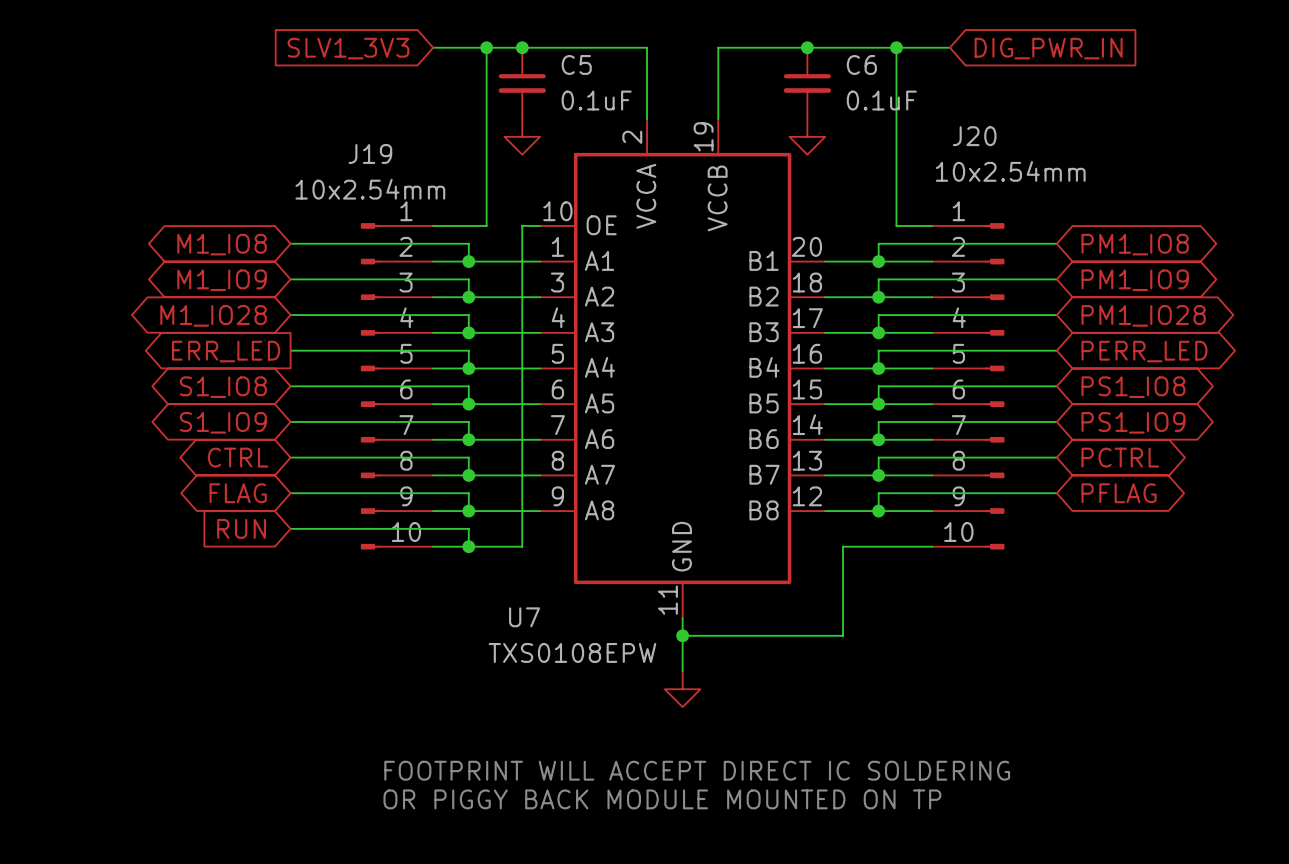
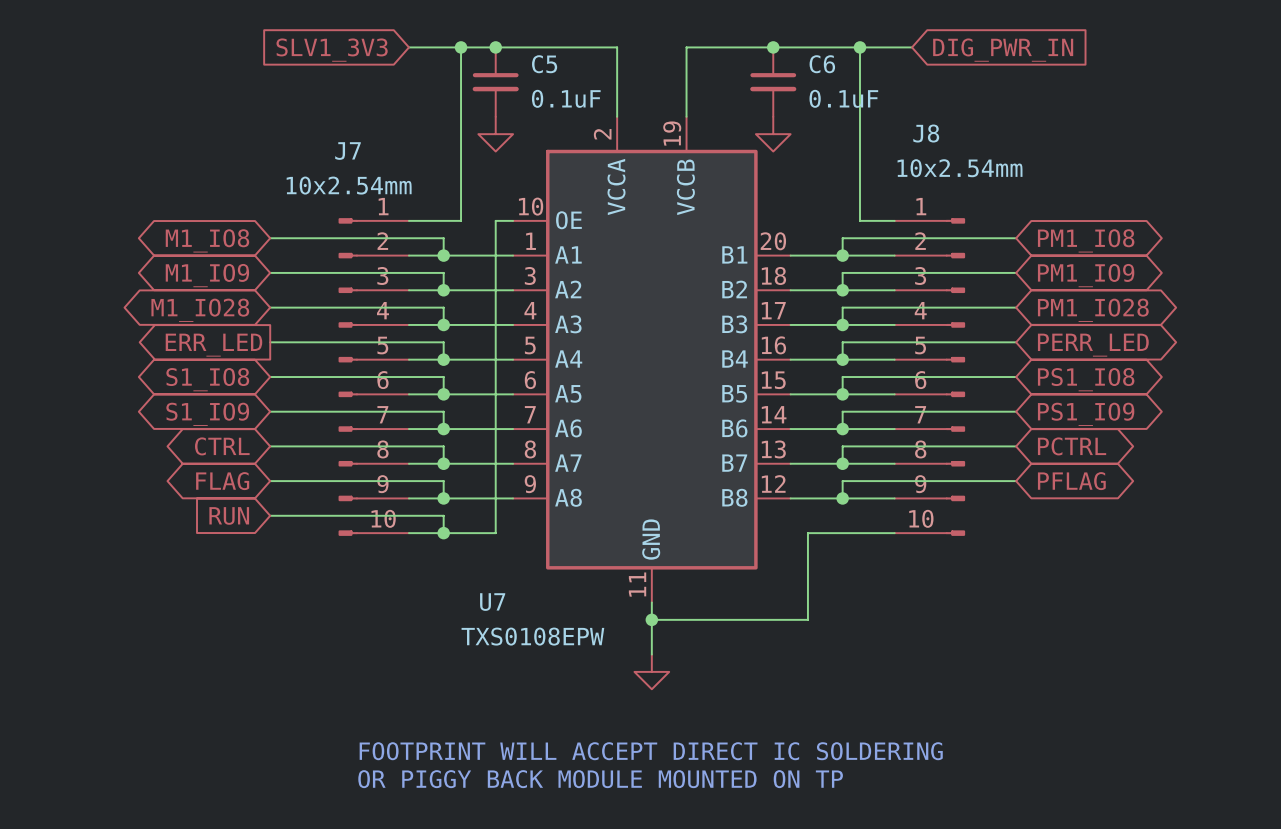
J20 name: J20 (974, 136) -> J8 (926, 133)
J19 name: J19 (370, 154) -> J7 (348, 151)

